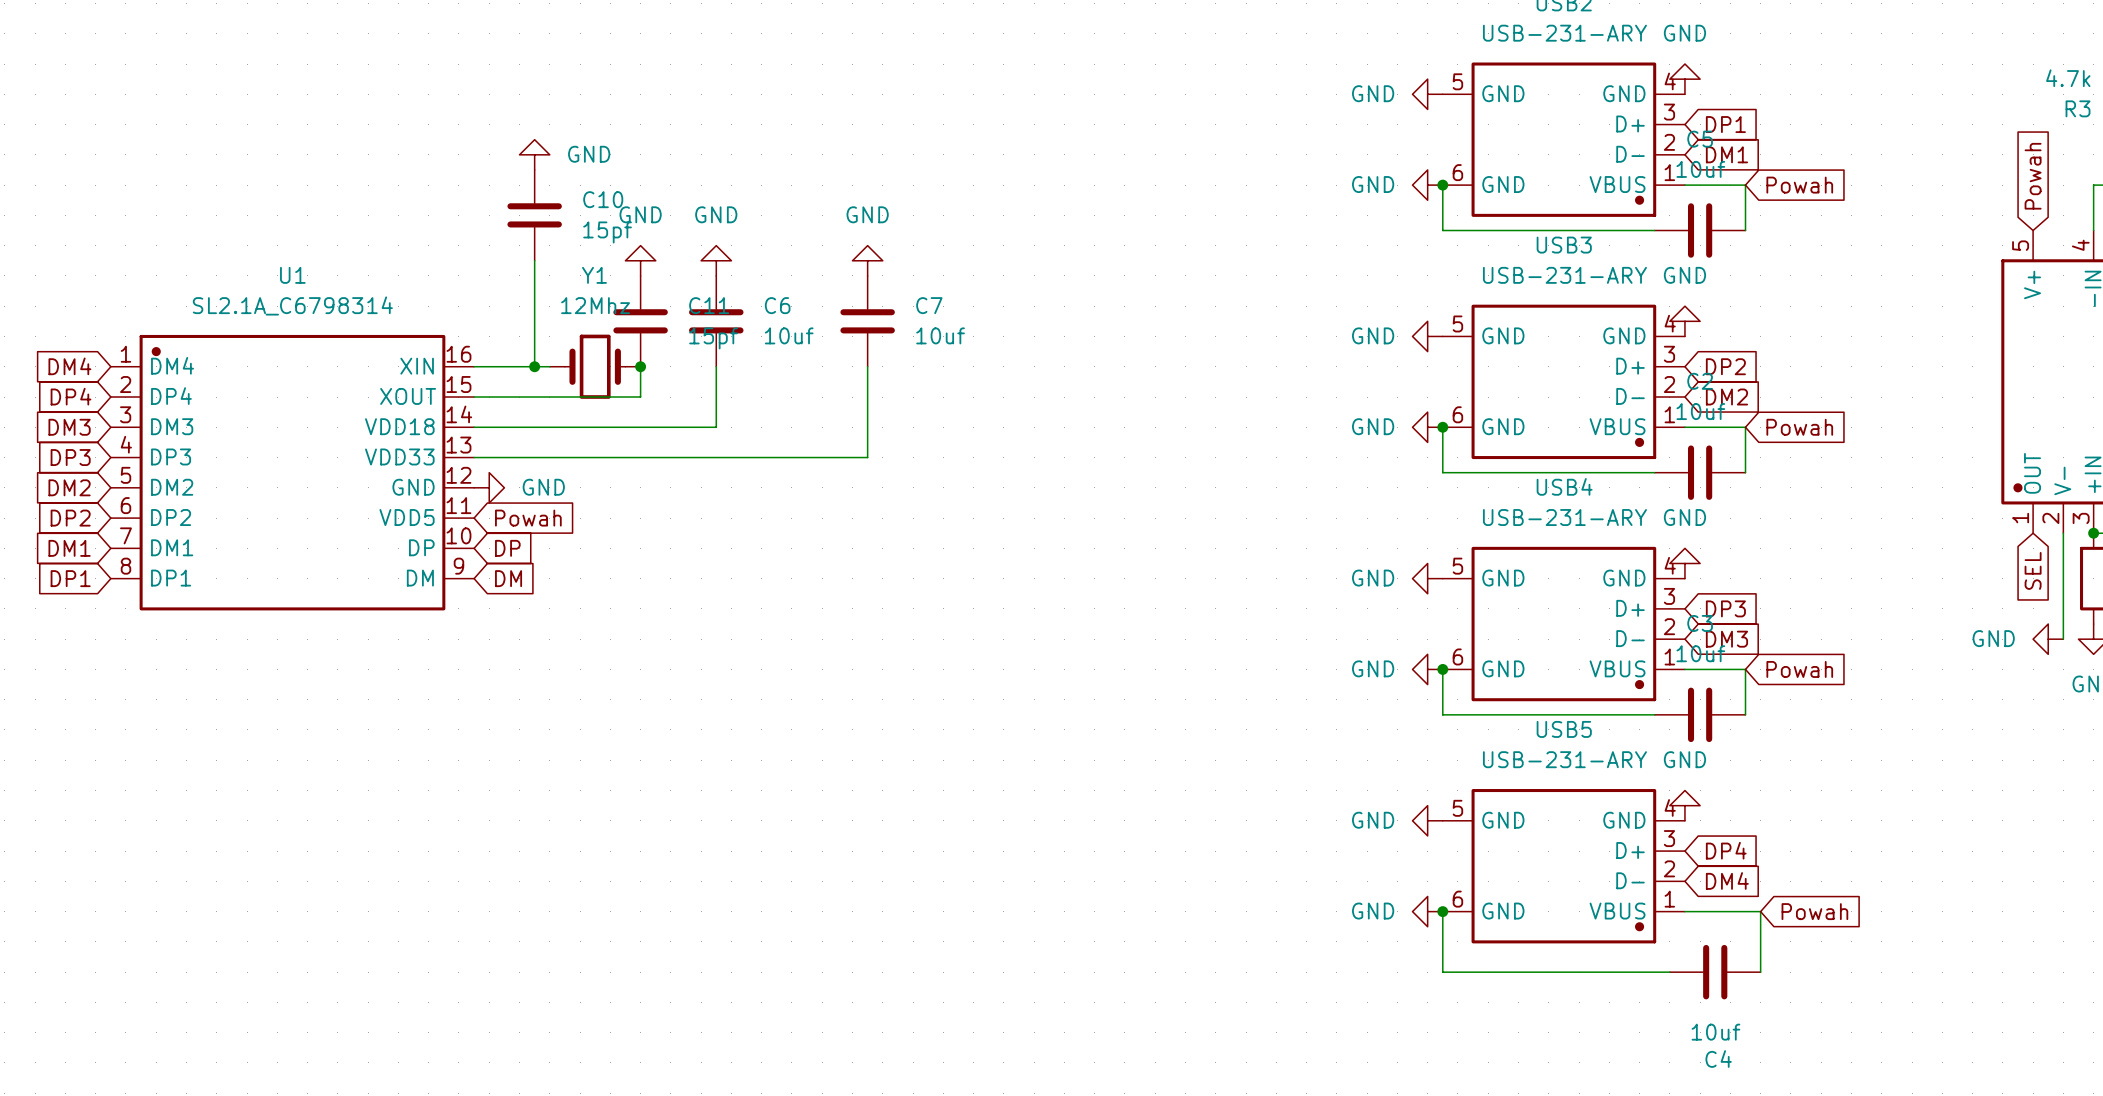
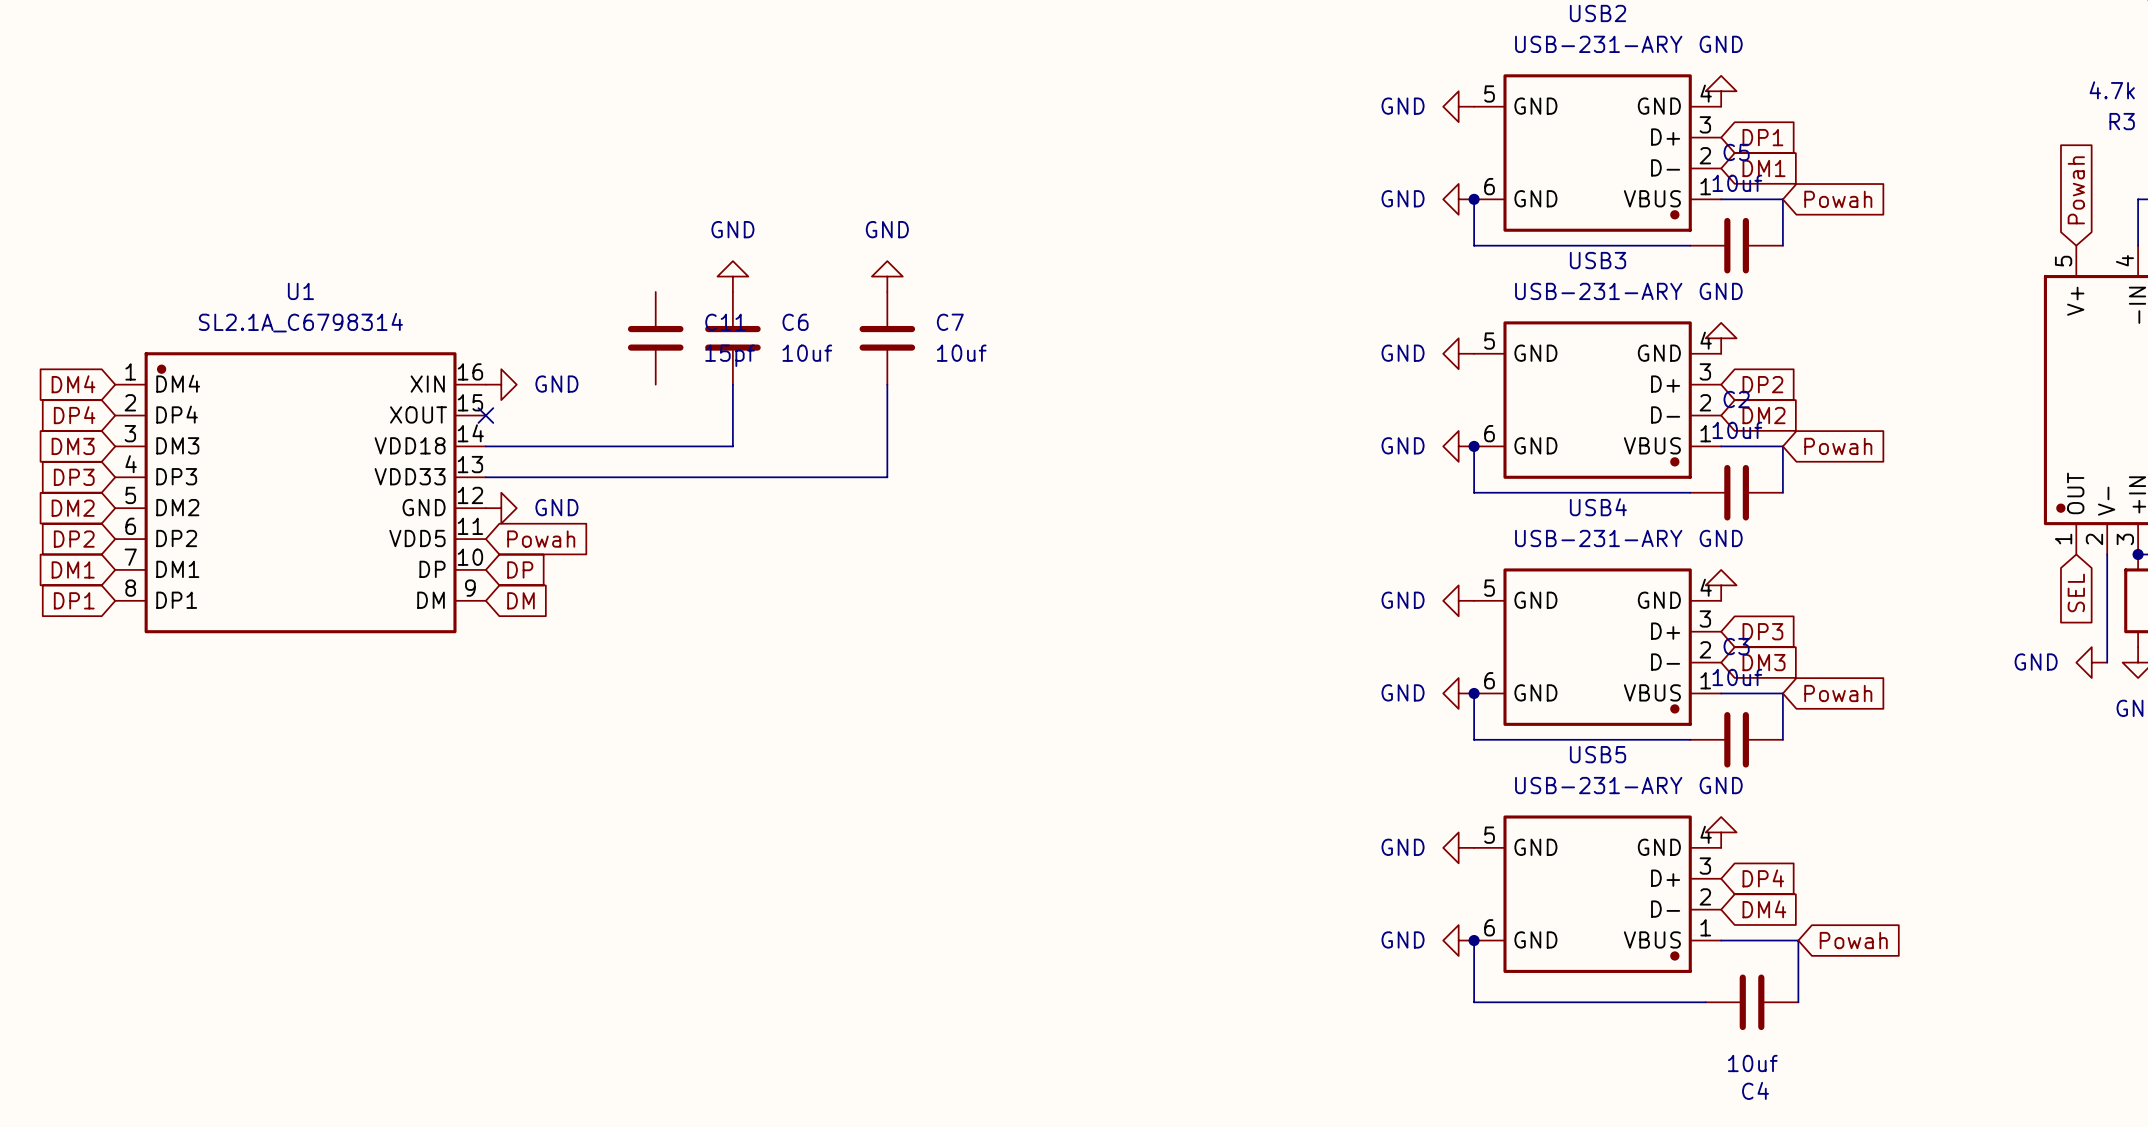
power symbol: GND (534, 154) -> none
C10: 15pf (534, 215) -> none
wire: (534, 260) (534, 366) -> none
power symbol: GND (640, 260) -> none
wire: (474, 366) (549, 366) -> none
power symbol: none -> GND (501, 384)
junction: (534, 366) -> none
Y1: 12Mhz (595, 366) -> none
wire: (640, 366) (640, 397) (474, 397) -> none
junction: (640, 366) -> none
no-connect mark: none -> (485, 415)

